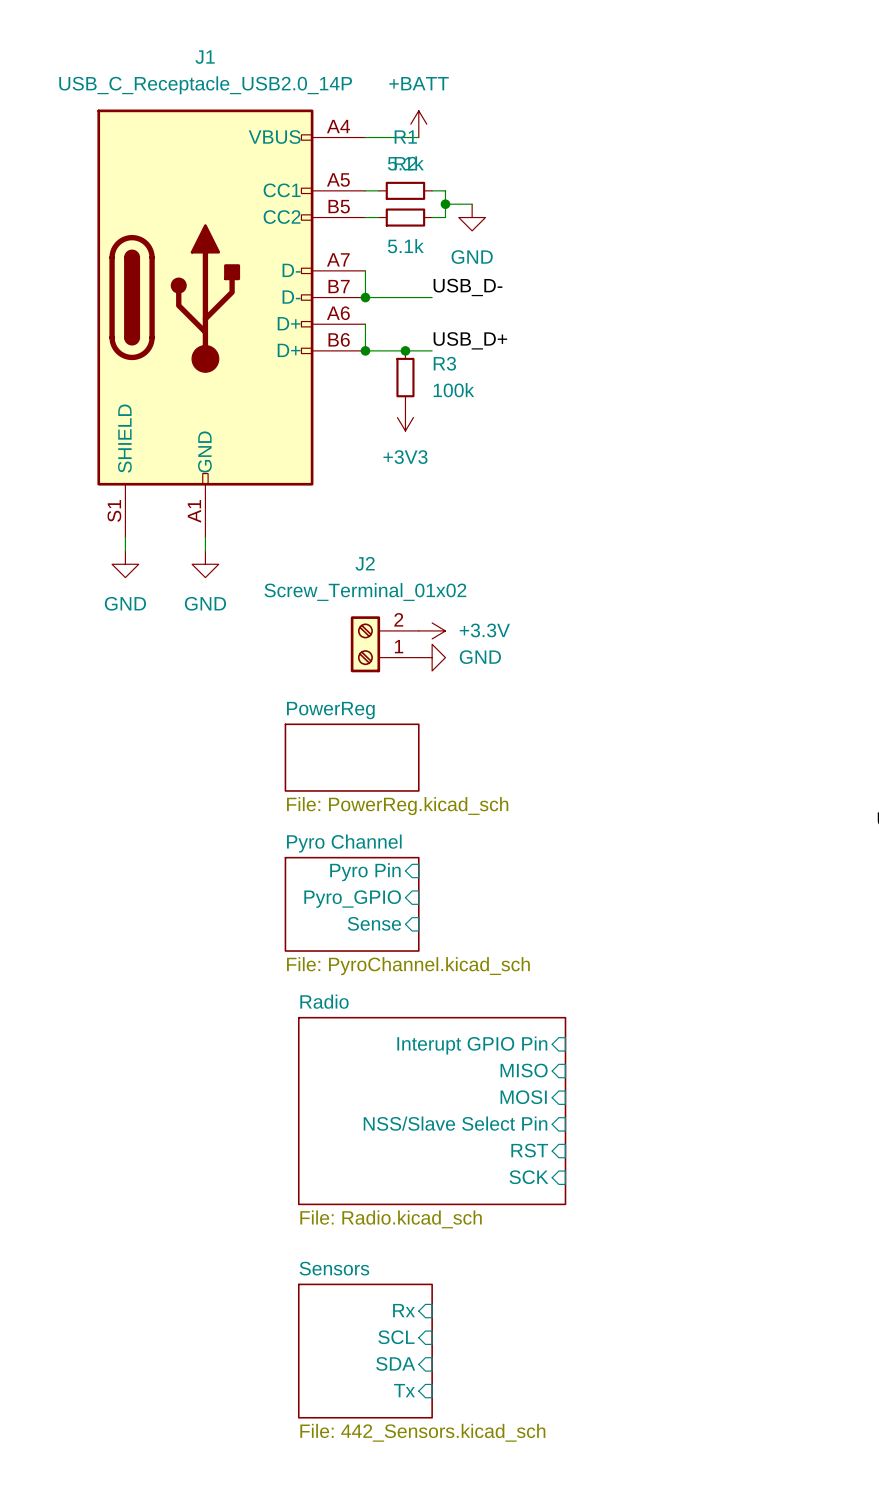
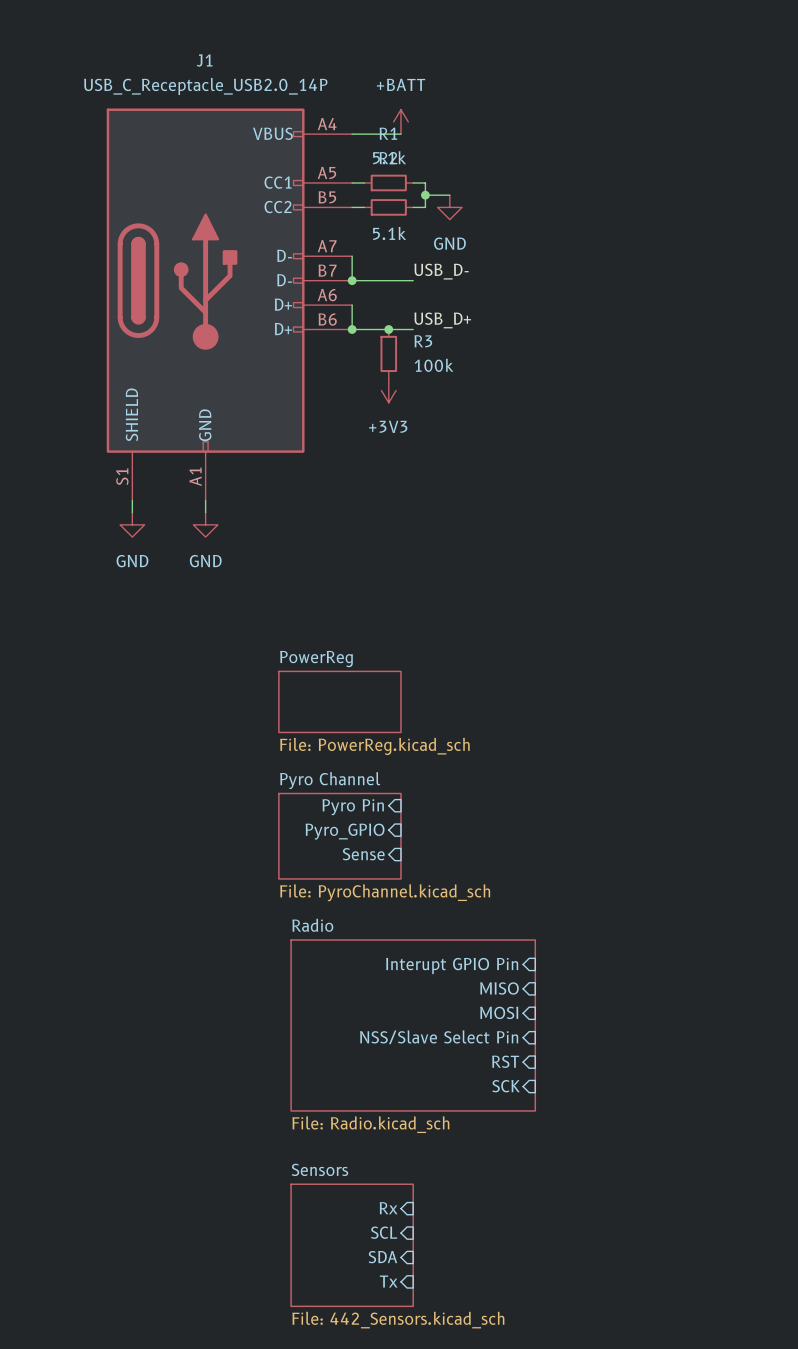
power symbol: +3.3V (432, 630) -> none
J2: Screw_Terminal_01x02 (384, 644) -> none
power symbol: GND (432, 657) -> none

